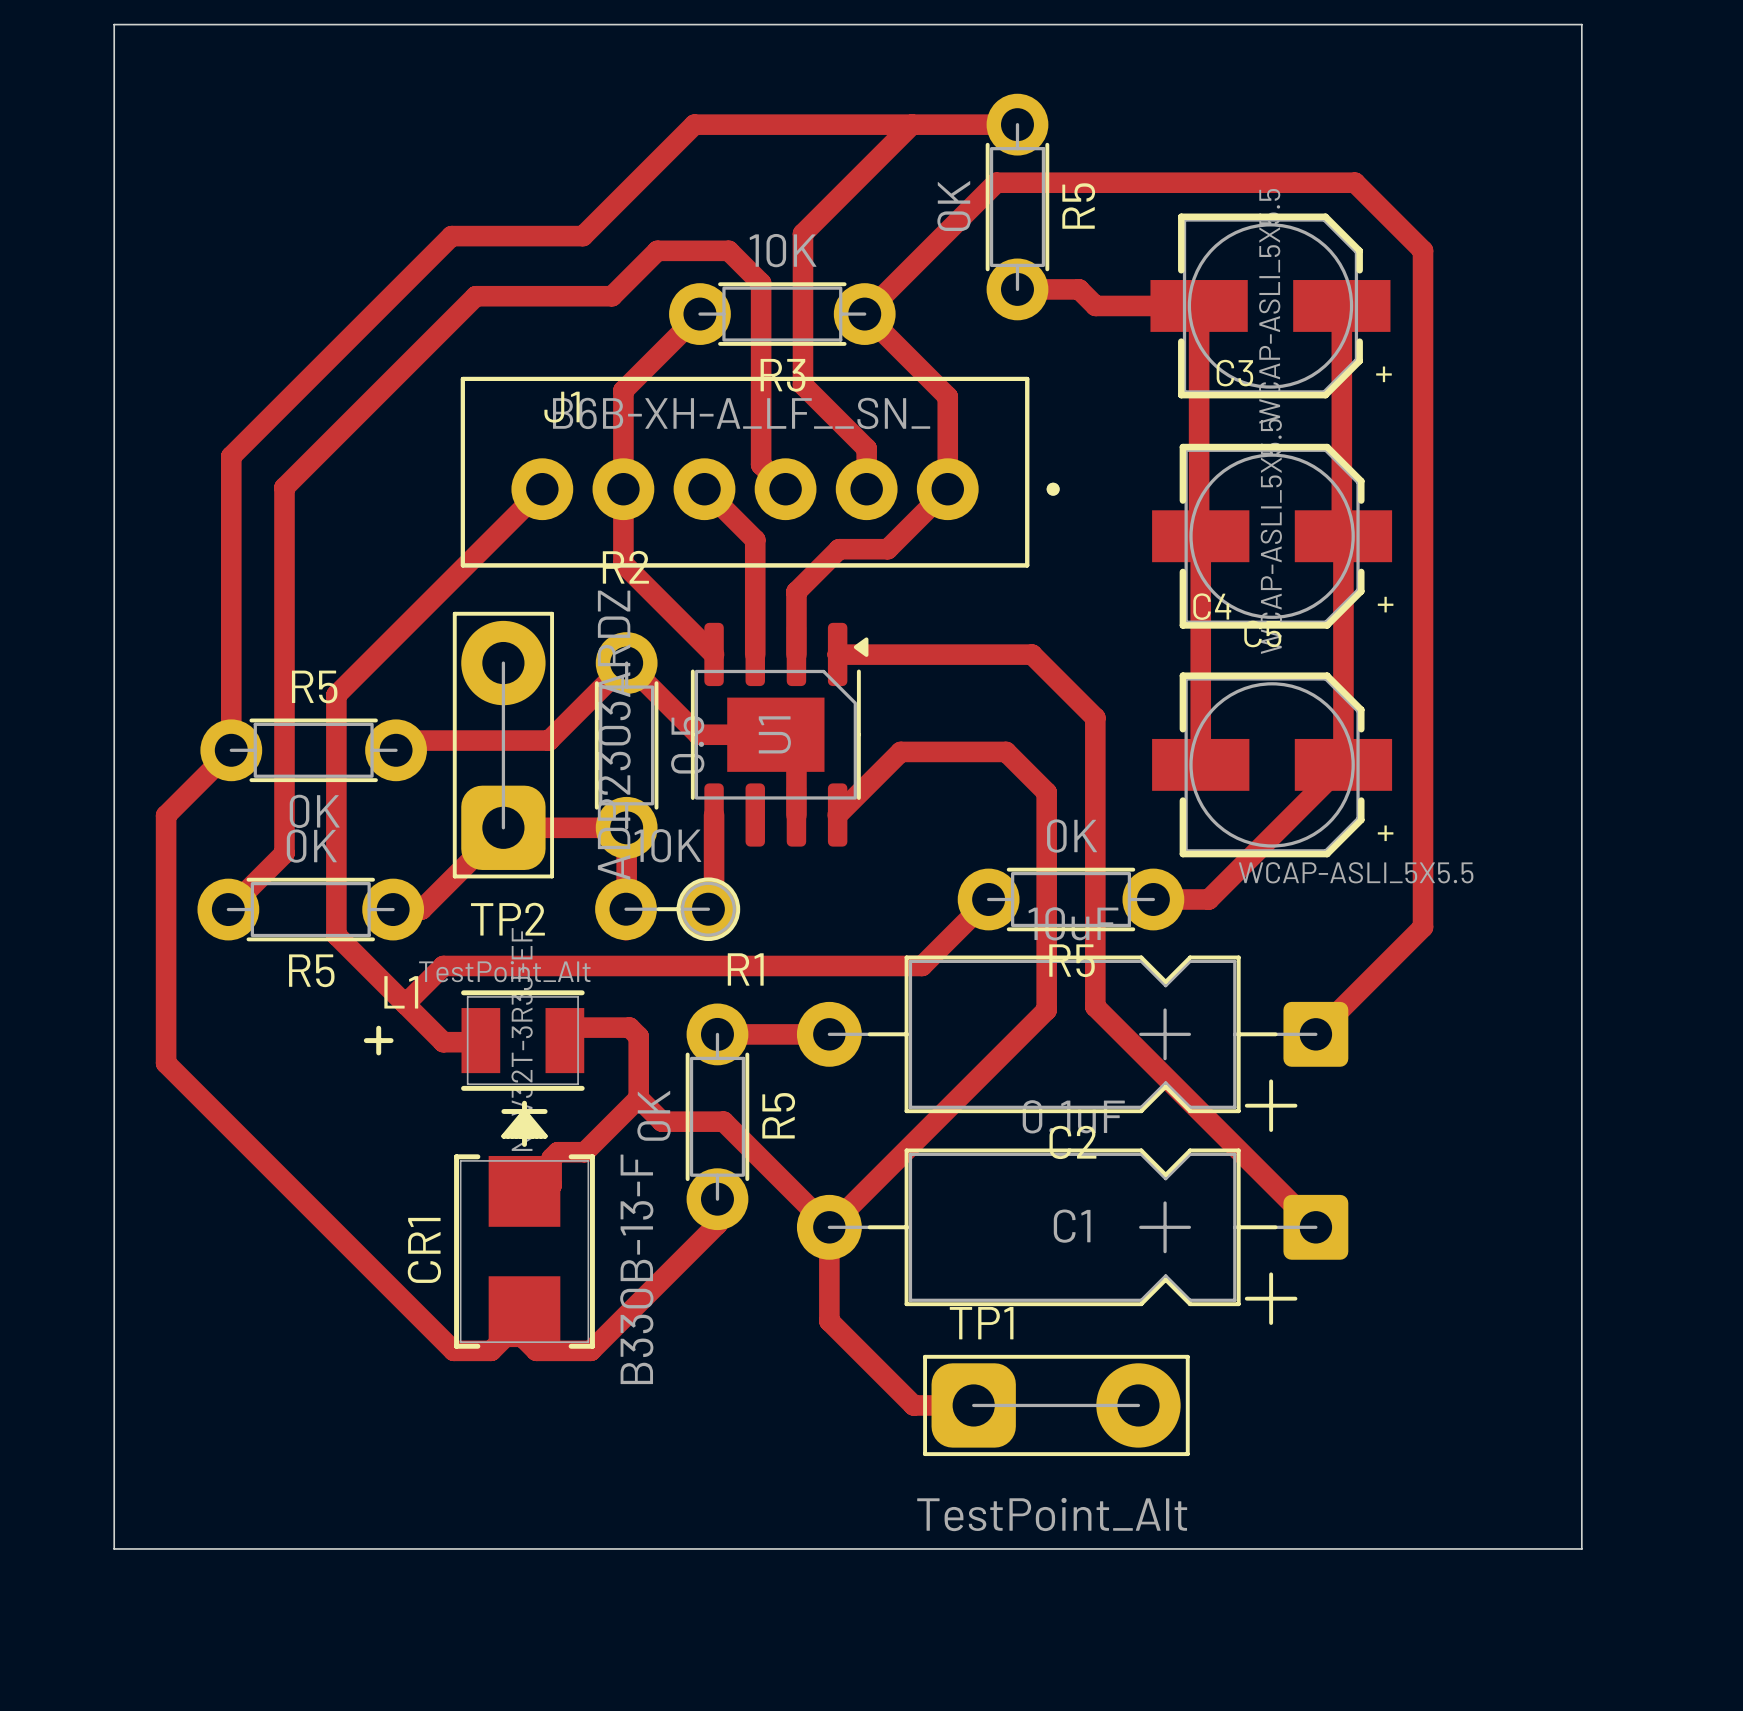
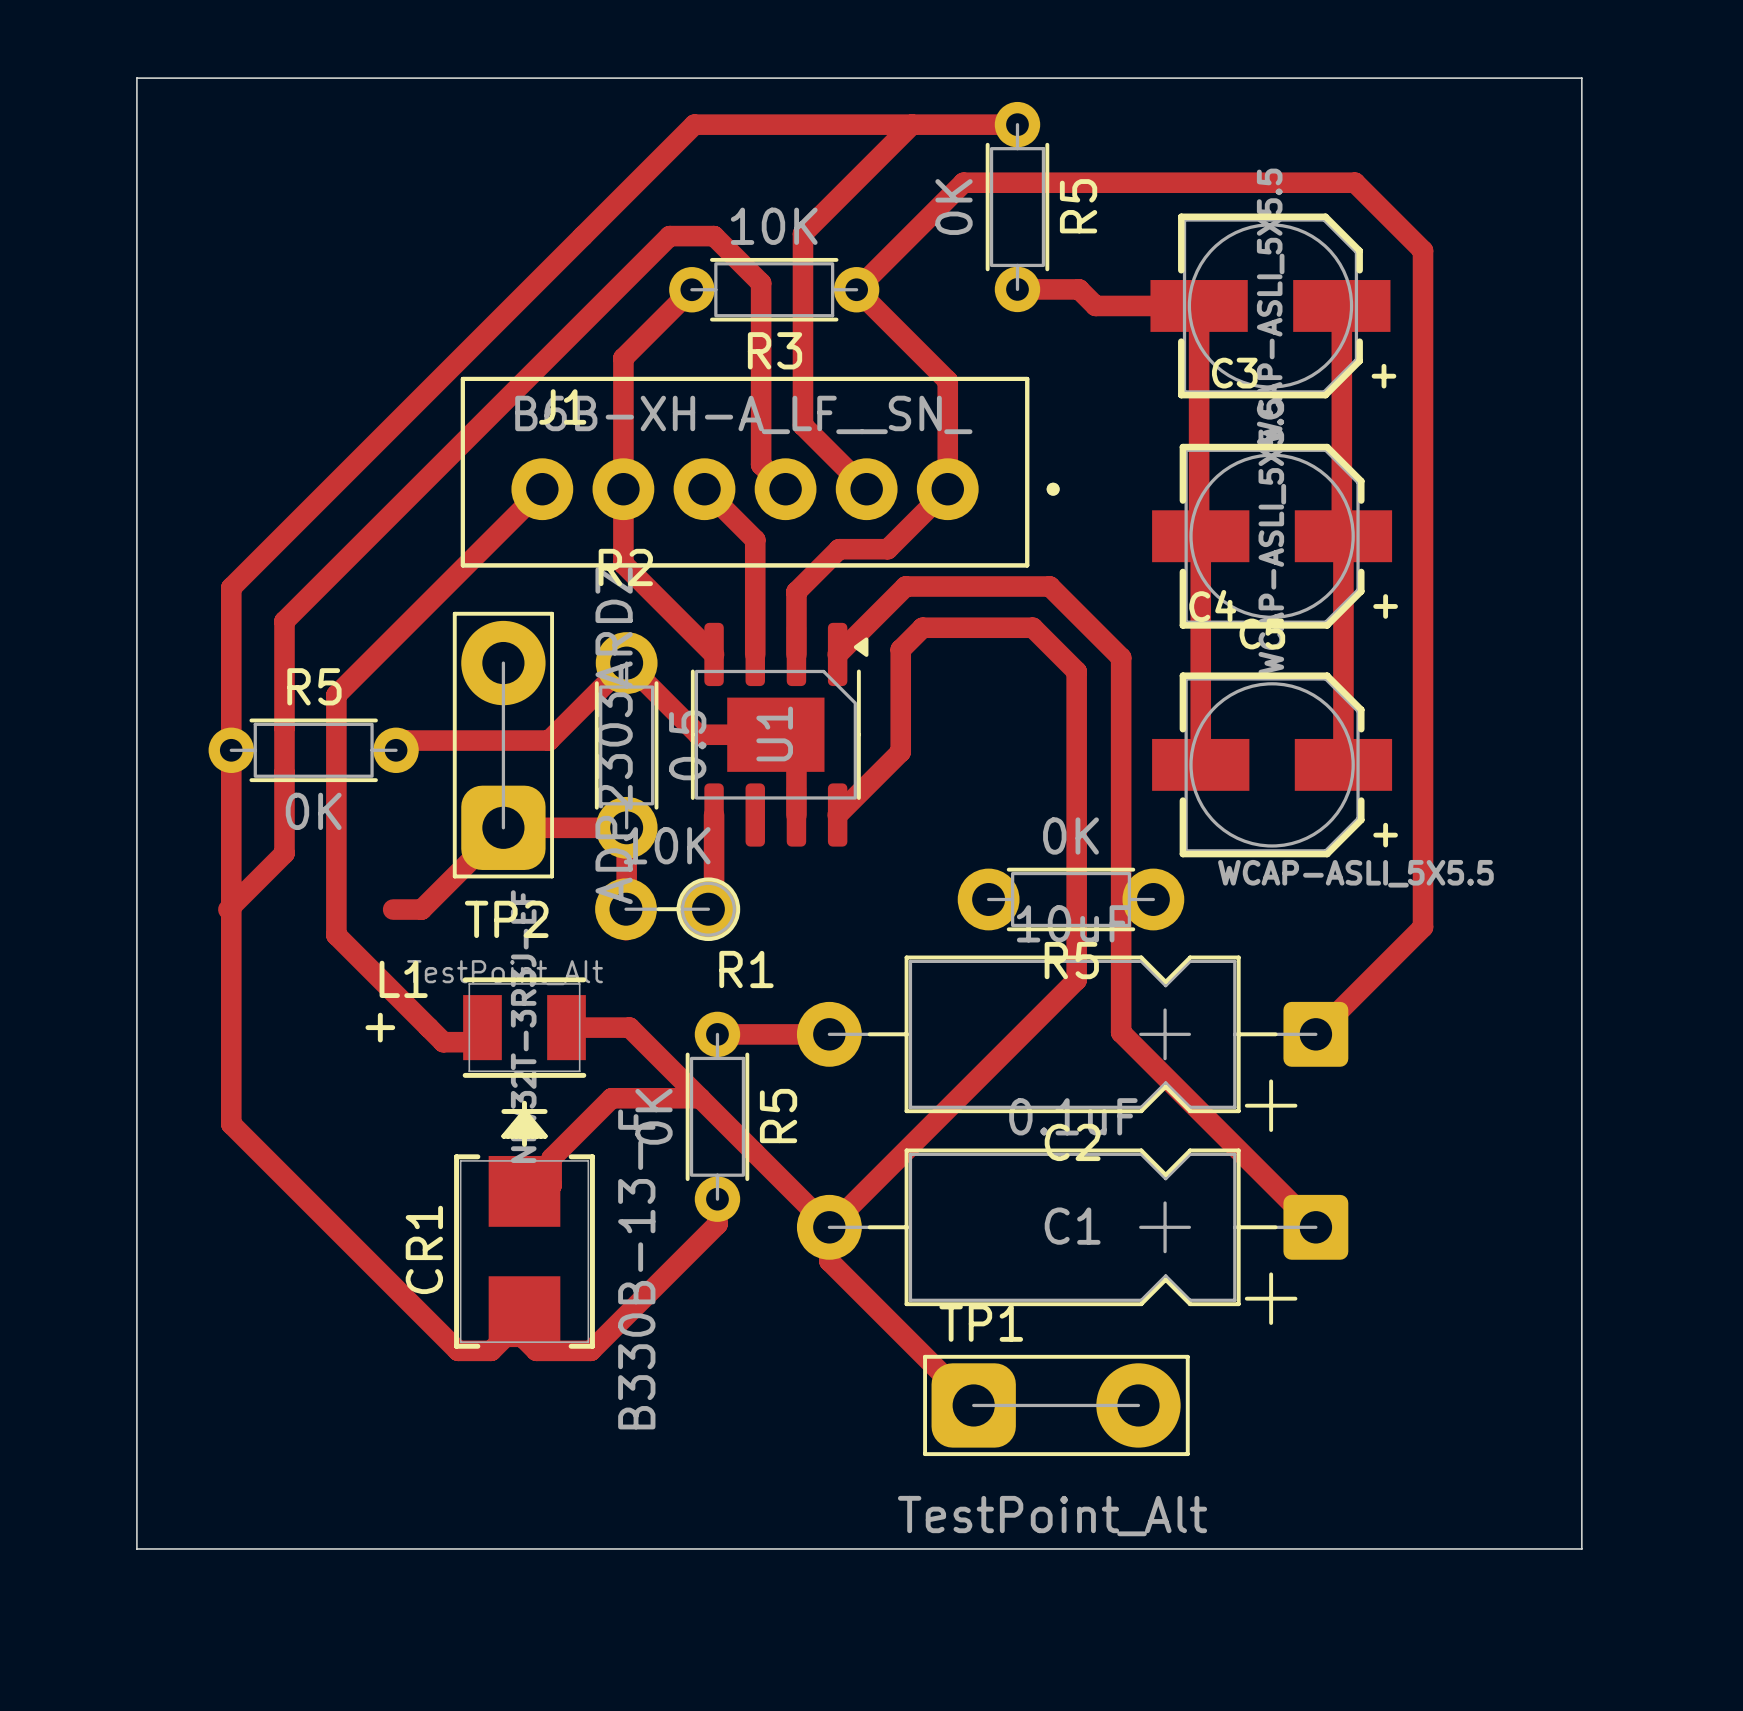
board edge: (1581, 78) (1581, 24) (114, 24) (114, 1548) (136, 1548) -> (1581, 78) (136, 78) (136, 1548)
R5 footprint: [985, 93, 1050, 321] -> [985, 101, 1050, 313]
track: (996, 182) (865, 314) (947, 396) -> (996, 182) (963, 182) (856, 289) (947, 380) (947, 396)
track: (582, 236) (451, 236) (231, 456) (231, 587) -> (582, 236) (231, 587)
track: (728, 250) (657, 250) (612, 296) (475, 296) (284, 487) (284, 621) -> (728, 250) (714, 236) (669, 236) (284, 621)
R3 footprint: [669, 282, 896, 346] -> [669, 257, 880, 322]
track: (699, 314) (623, 390) -> (691, 289) (623, 358) (623, 390)
track: (802, 384) (866, 448) (866, 489) -> (802, 384) (802, 425) (866, 489)
track: (837, 654) (1032, 654) (1095, 717) (1095, 1006) (1121, 1032) -> (837, 654) (905, 586) (1049, 586) (1121, 657) (1121, 1032)
R5 footprint: [200, 718, 427, 783] -> [208, 718, 419, 783]
track: (231, 750) (166, 815) (166, 1063) (453, 1350) (458, 1350) -> (231, 750) (231, 1124) (458, 1350)
track: (900, 751) (1006, 751) (1046, 792) (1046, 1010) -> (900, 751) (900, 649) (922, 627) (1032, 627) (1076, 671) (1076, 980) (1046, 1010)
track: (1343, 764) (1208, 899) (1153, 899) -> none
track: (988, 899) (922, 965) (443, 965) (405, 1004) -> none
R5: 0K (310, 909) -> none
R5 footprint: [685, 1003, 750, 1231] -> [685, 1011, 750, 1222]
track: (638, 1036) (638, 1098) -> none
L1 position: (474, 1040) -> (475, 1027)
track: (638, 1098) (584, 1152) (557, 1152) -> (700, 1098) (611, 1098) (557, 1152)
track: (638, 1098) (662, 1121) (723, 1121) -> (638, 1036) (723, 1121)
track: (829, 1261) (829, 1321) (913, 1405) (973, 1405) -> (829, 1261) (973, 1405)

